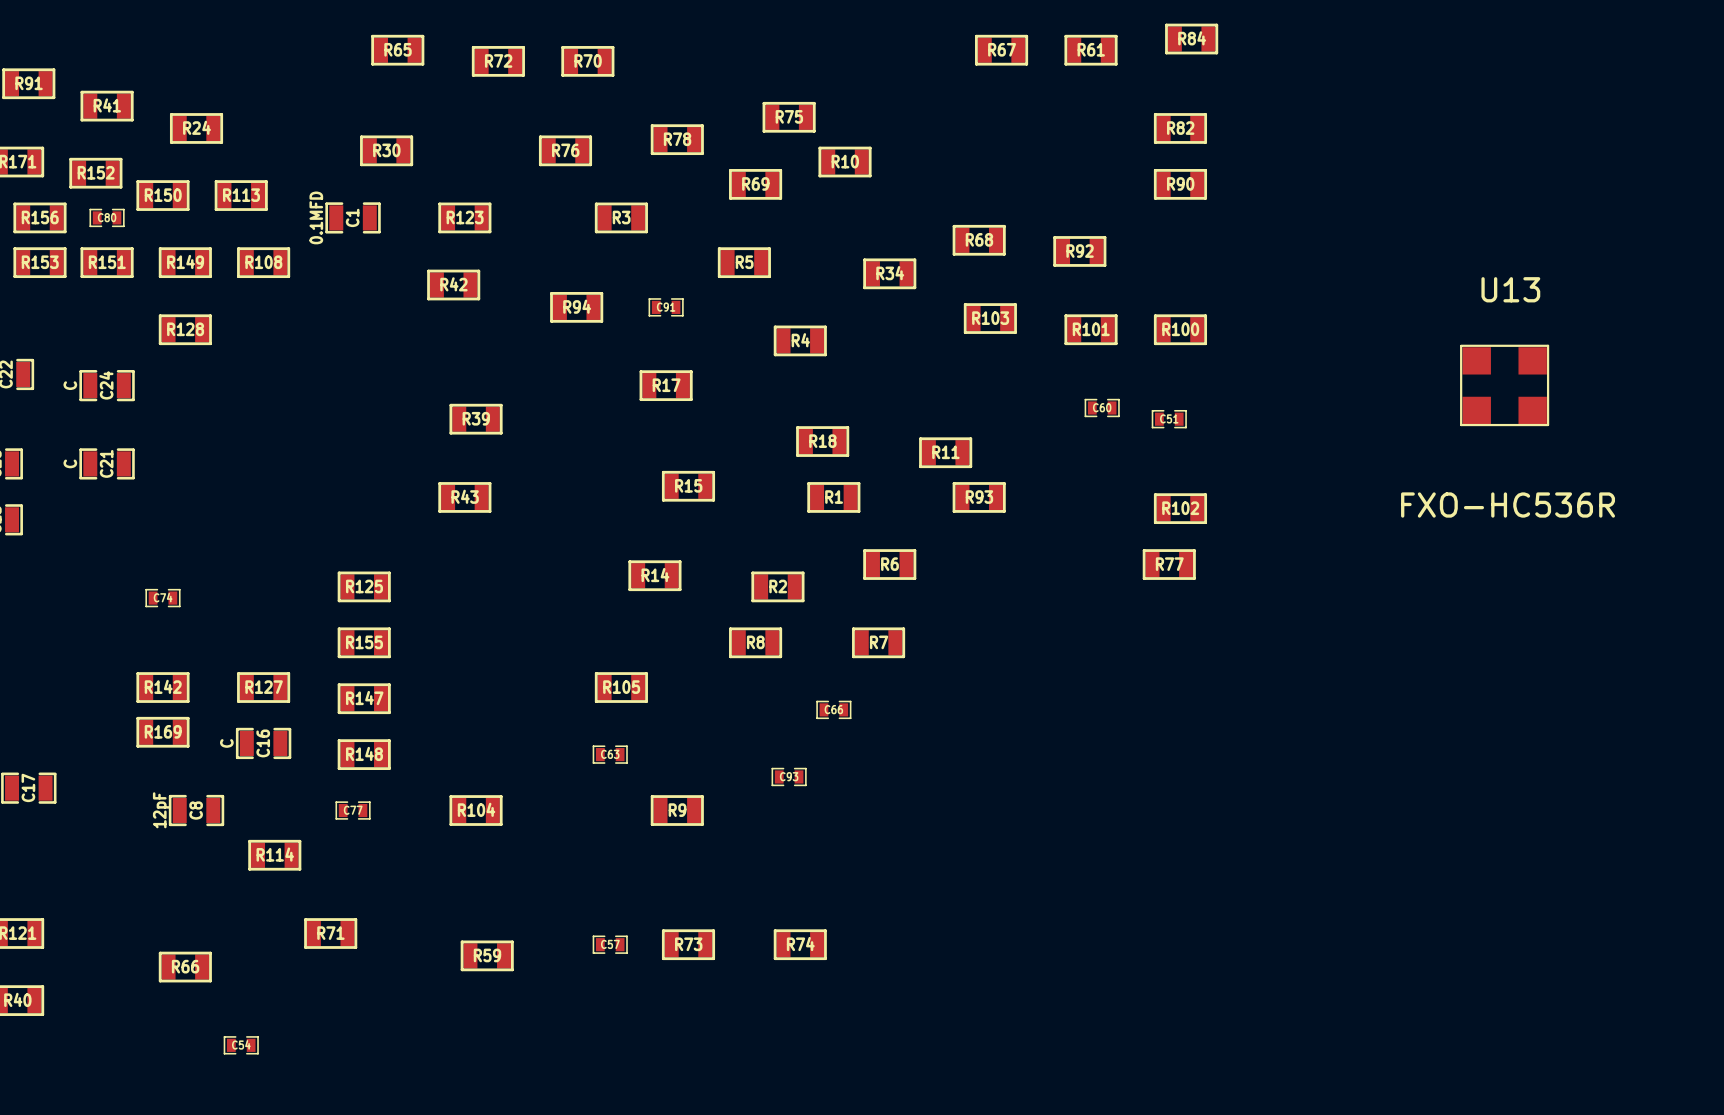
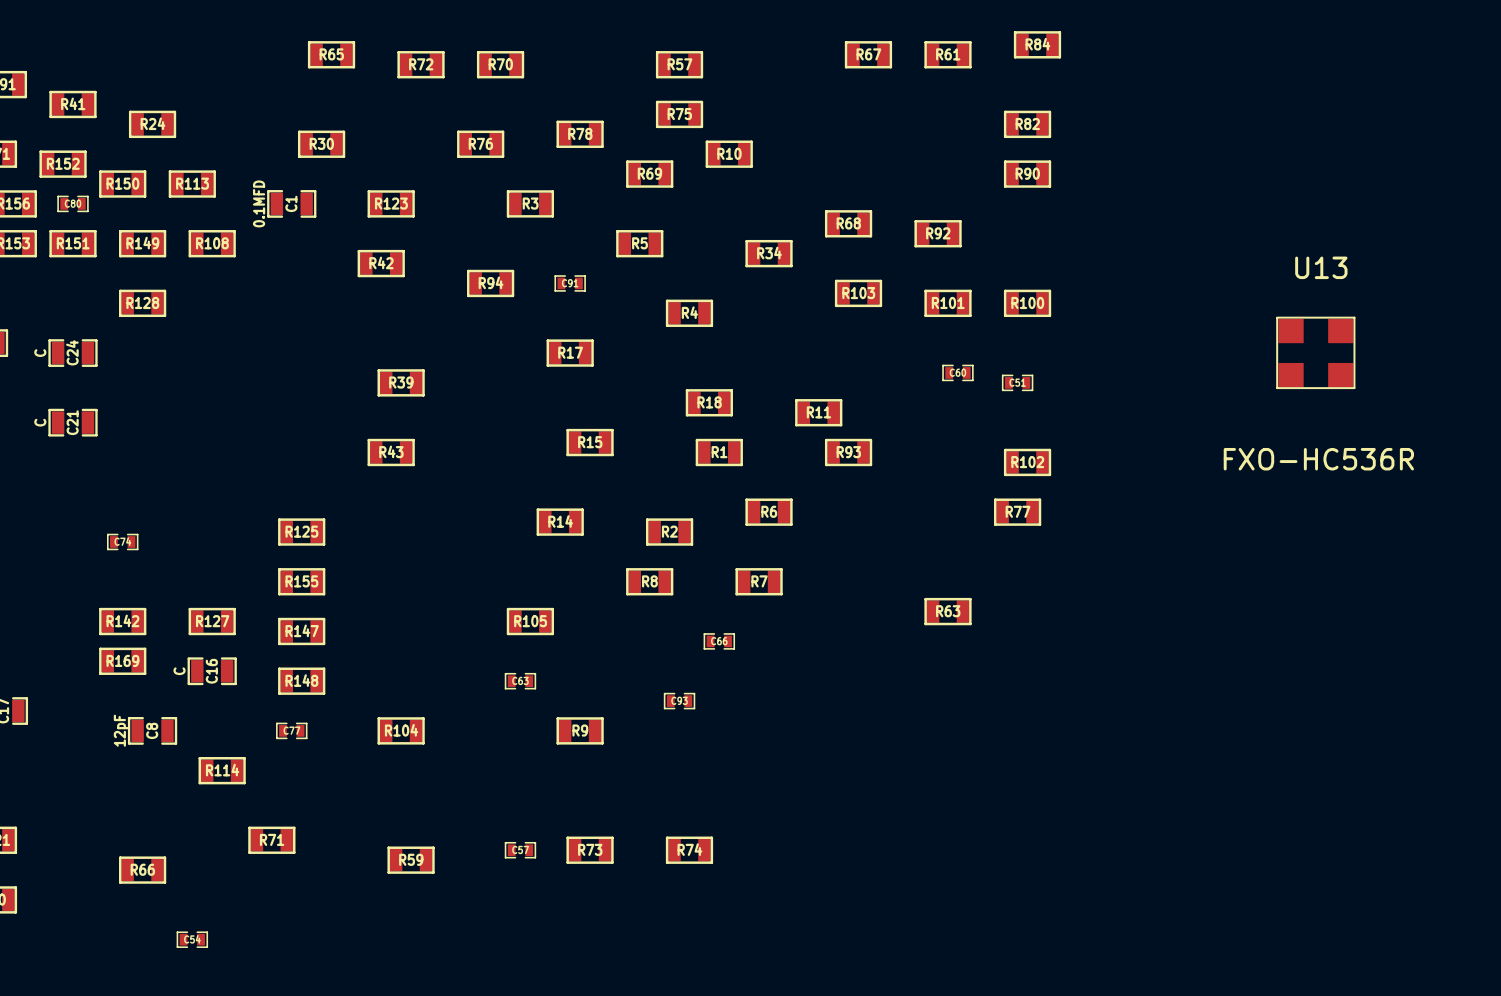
R57: none -> (679, 64)
R63: none -> (948, 611)

